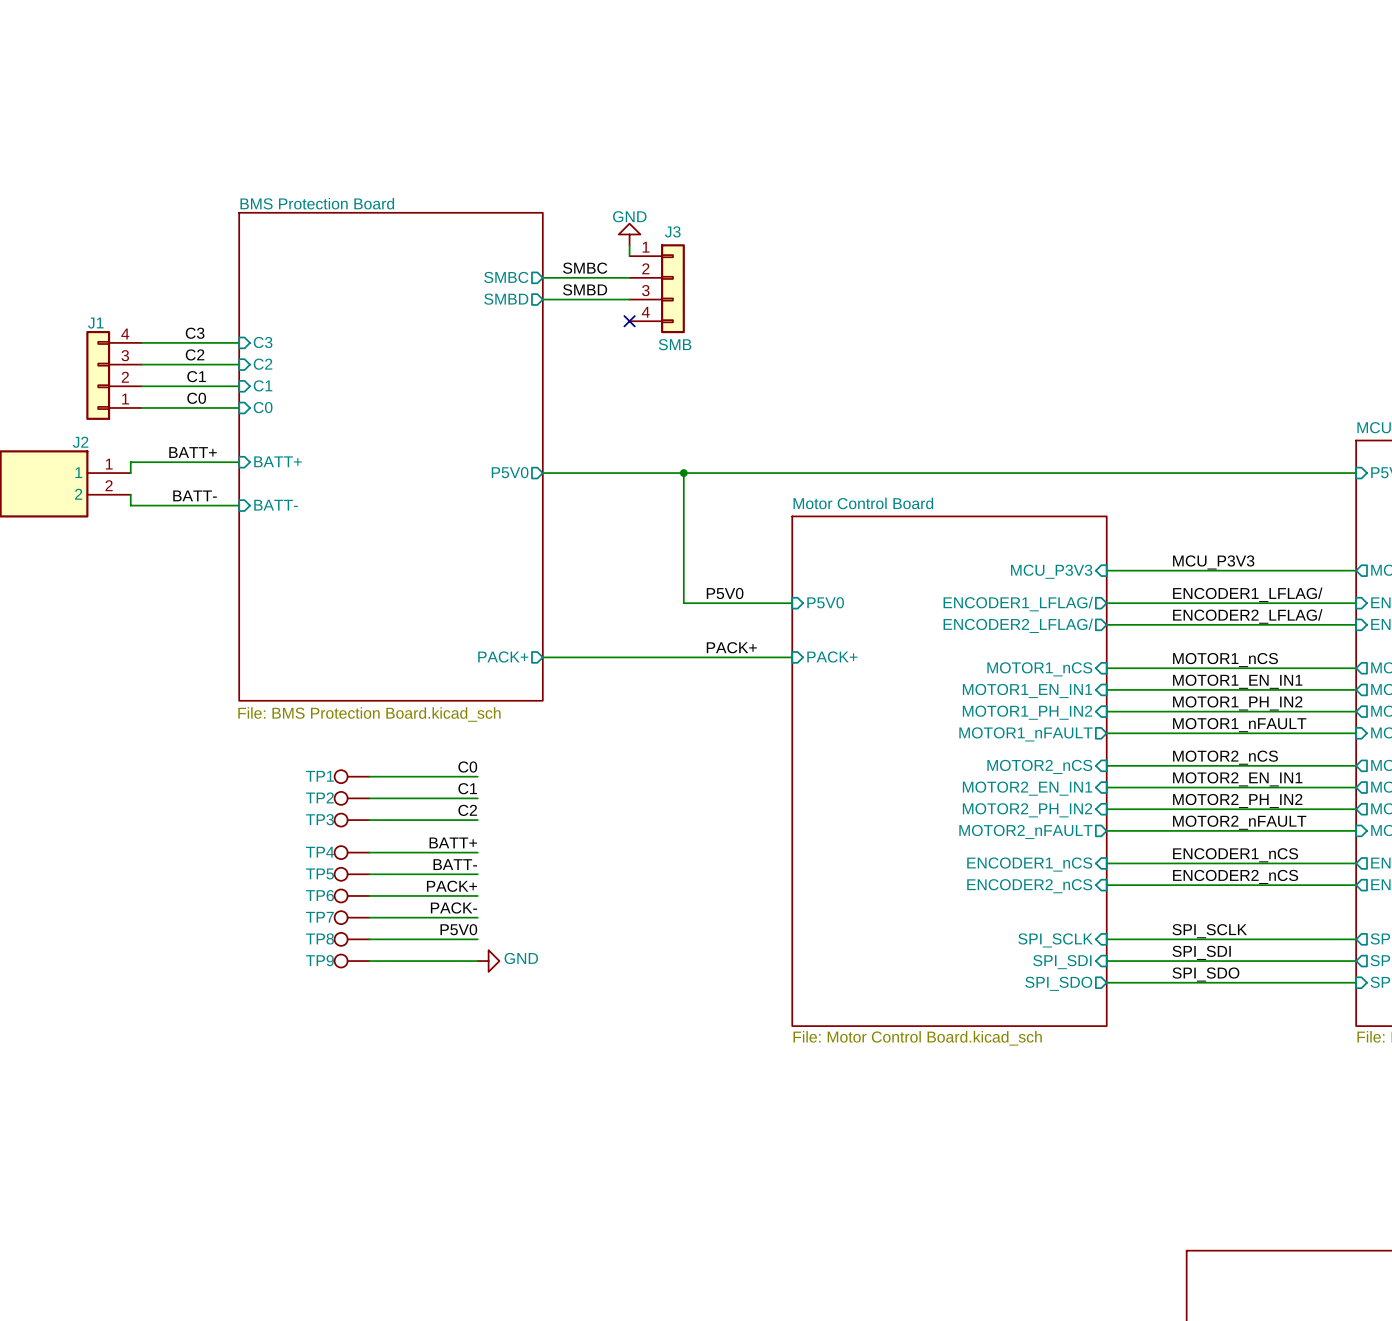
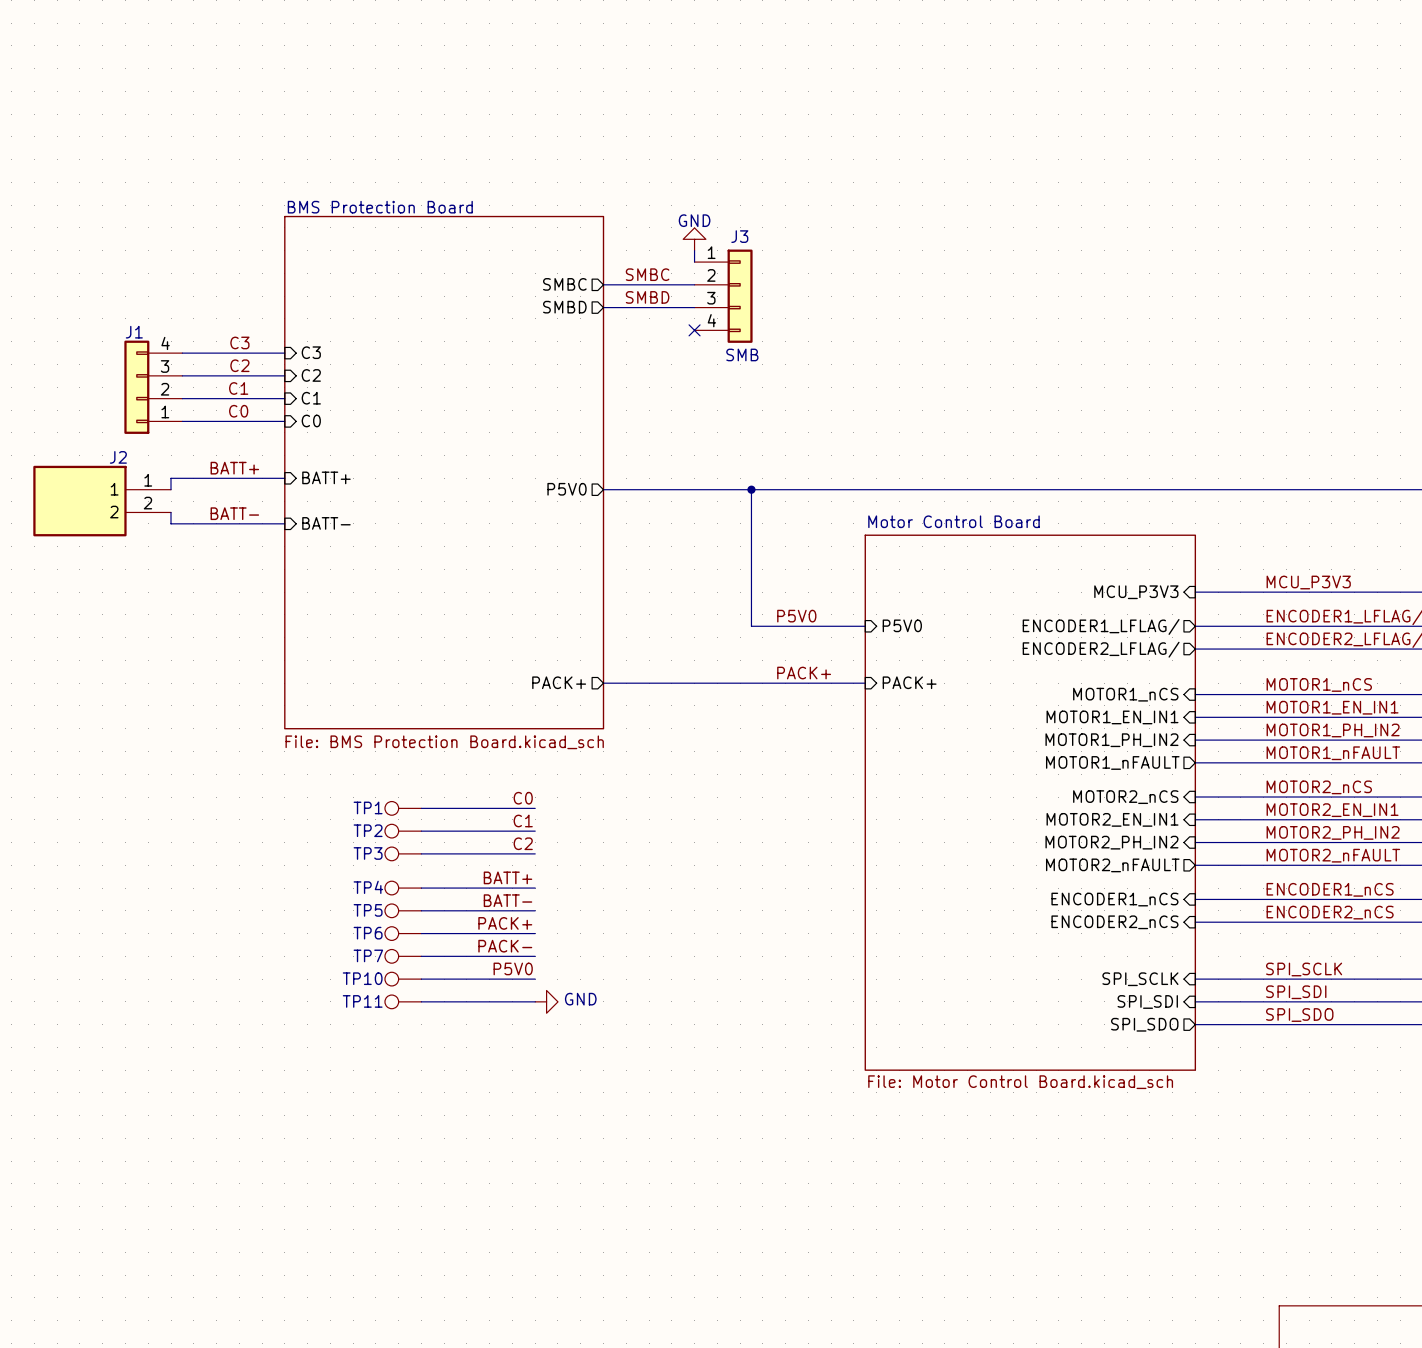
TP8 name: TP8 (319, 938) -> TP10 (362, 978)
TP9 name: TP9 (319, 960) -> TP11 (362, 1001)

